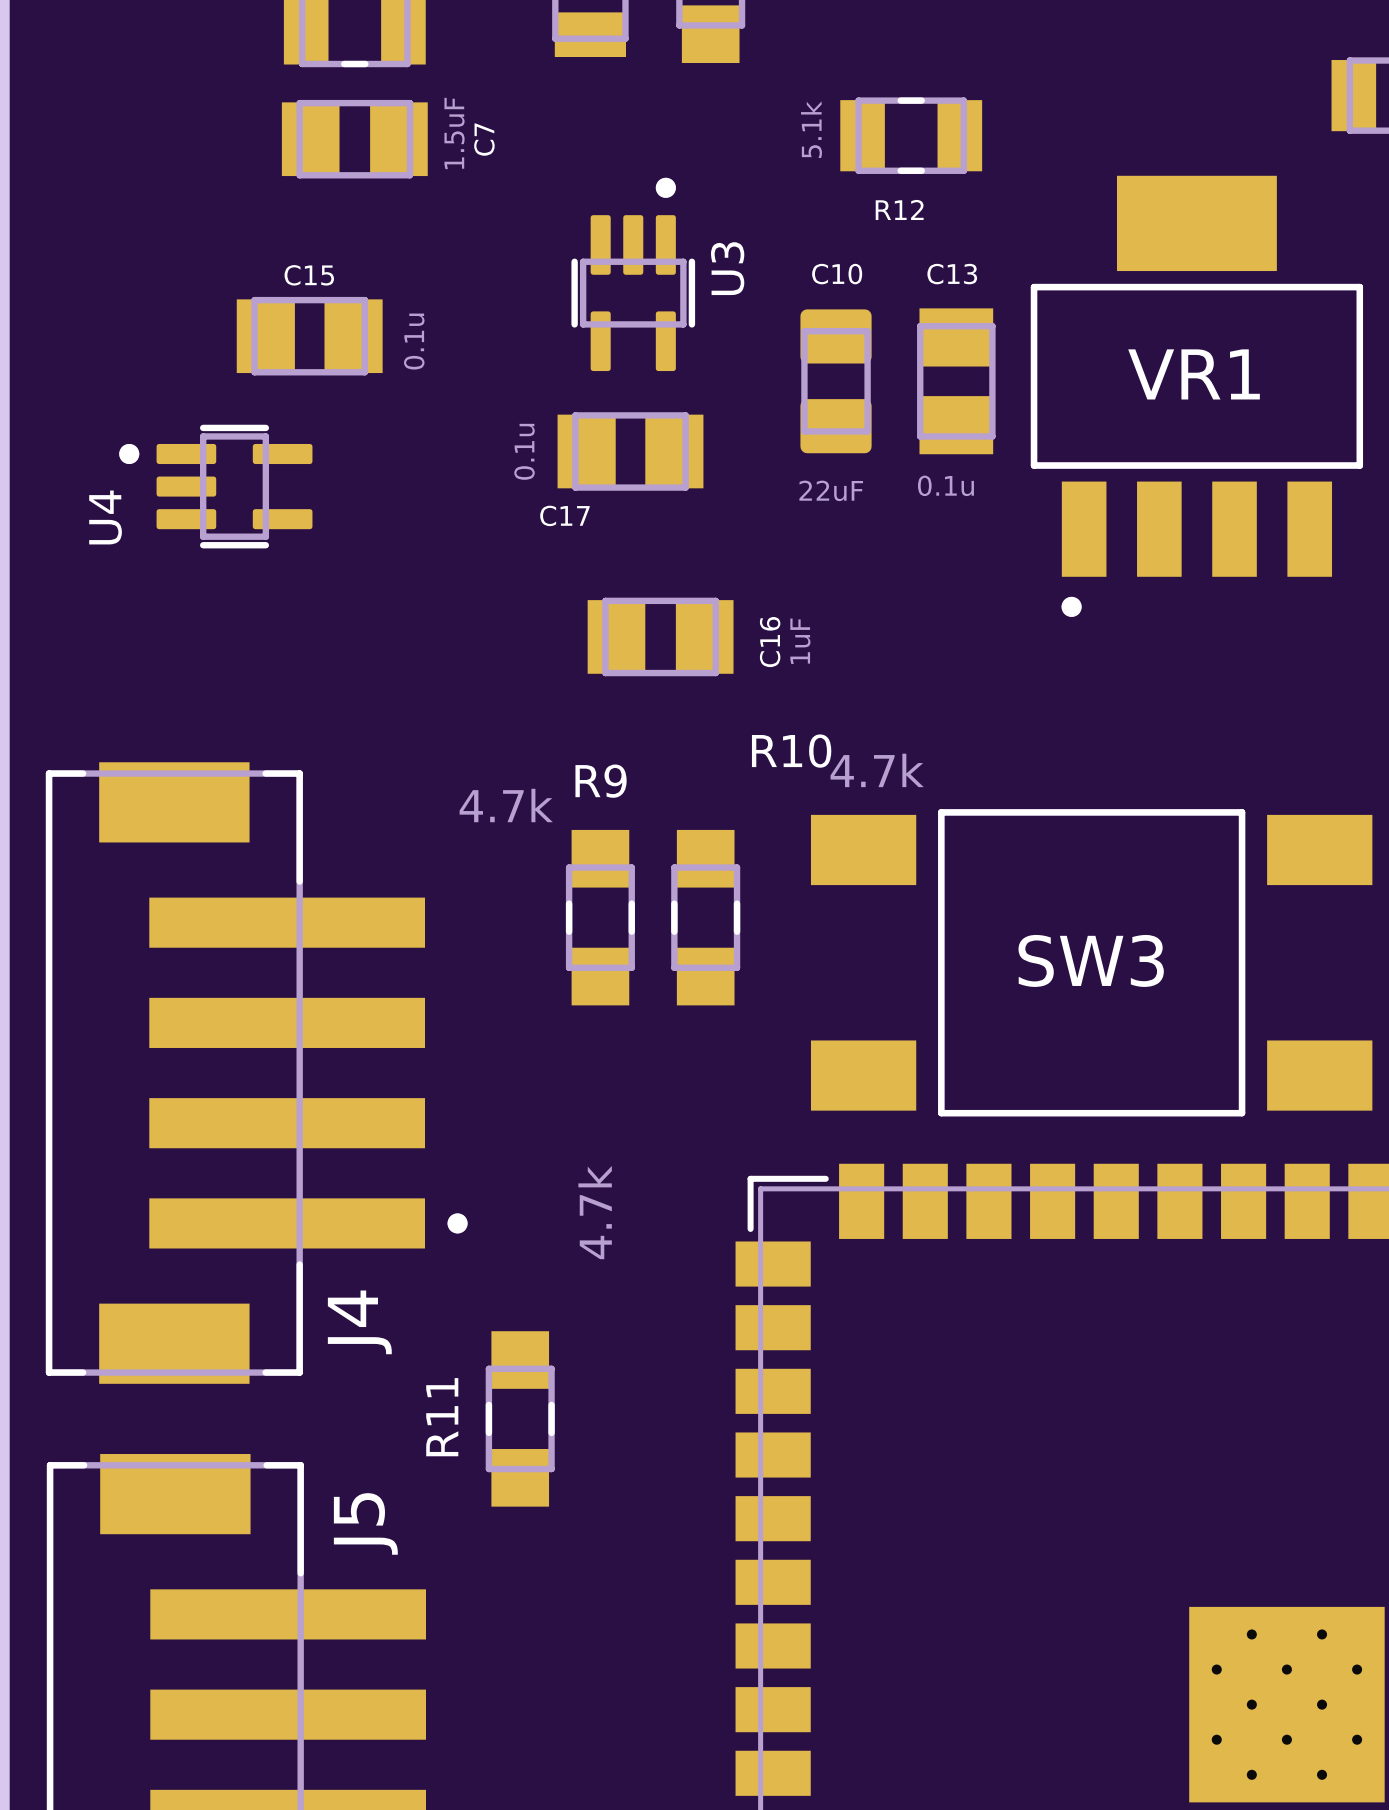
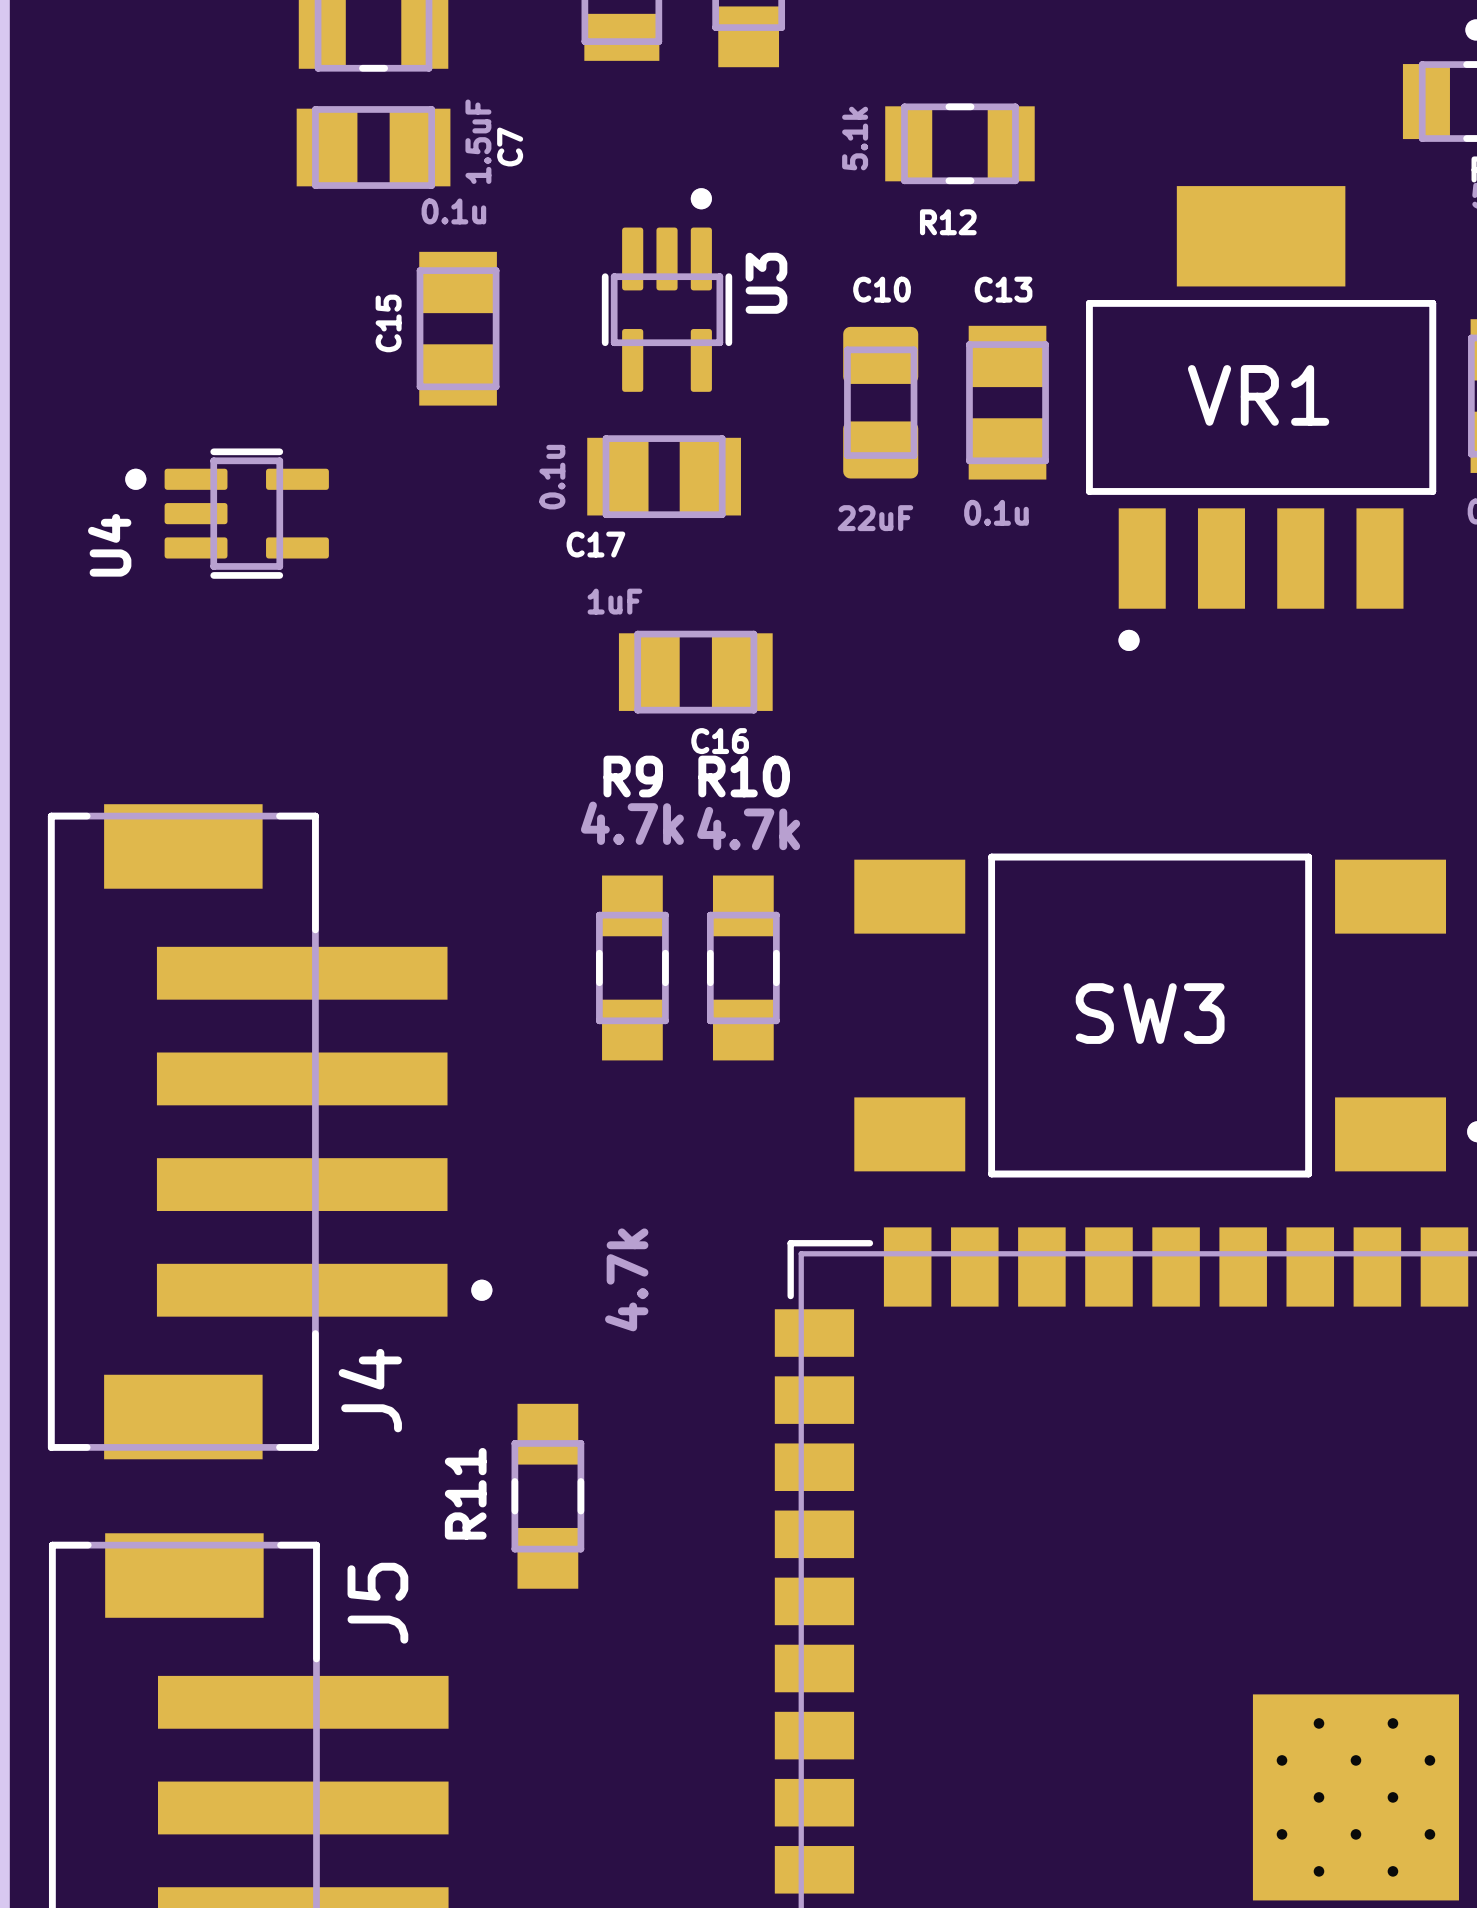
C15 rotation: 0° (309, 336) -> 90° clockwise (458, 328)
C15 position: (309, 336) -> (458, 328)
C15 value position: 0.1u (414, 341) -> 0.1u (453, 211)
C16 value rotation: 0° (800, 641) -> 90° clockwise (614, 601)
C16 value position: 1uF (800, 641) -> 1uF (614, 601)
C16 name rotation: 0° (770, 642) -> 90° clockwise (720, 741)
C16 name position: C16 (770, 642) -> C16 (720, 741)
R10 name position: R10 (791, 751) -> R10 (744, 776)
R10 value position: 4.7k (877, 770) -> 4.7k (748, 828)
R9 name position: R9 (601, 781) -> R9 (633, 776)
R9 value position: 4.7k (506, 805) -> 4.7k (632, 823)

